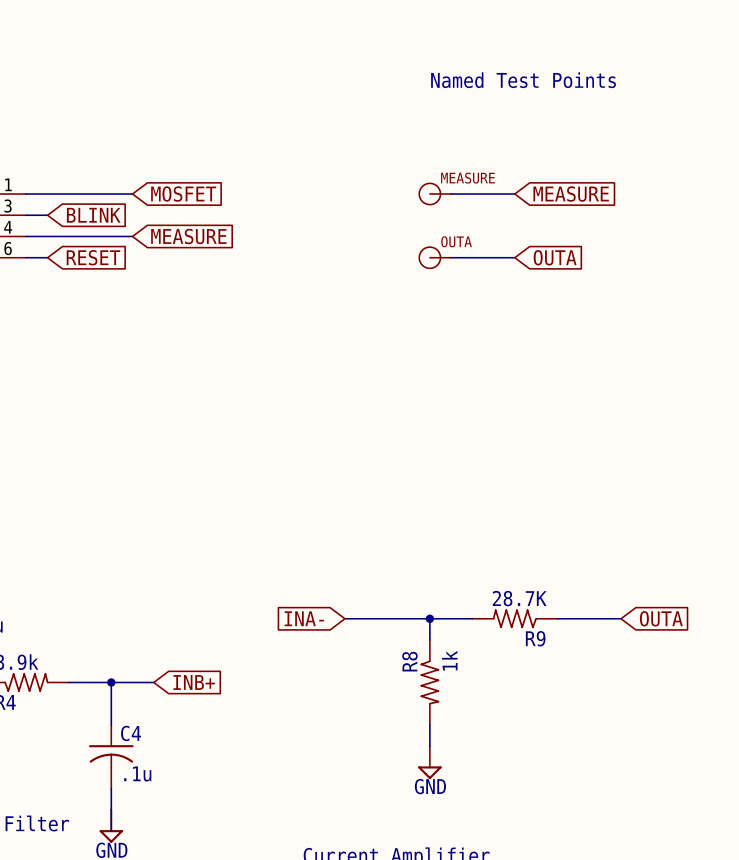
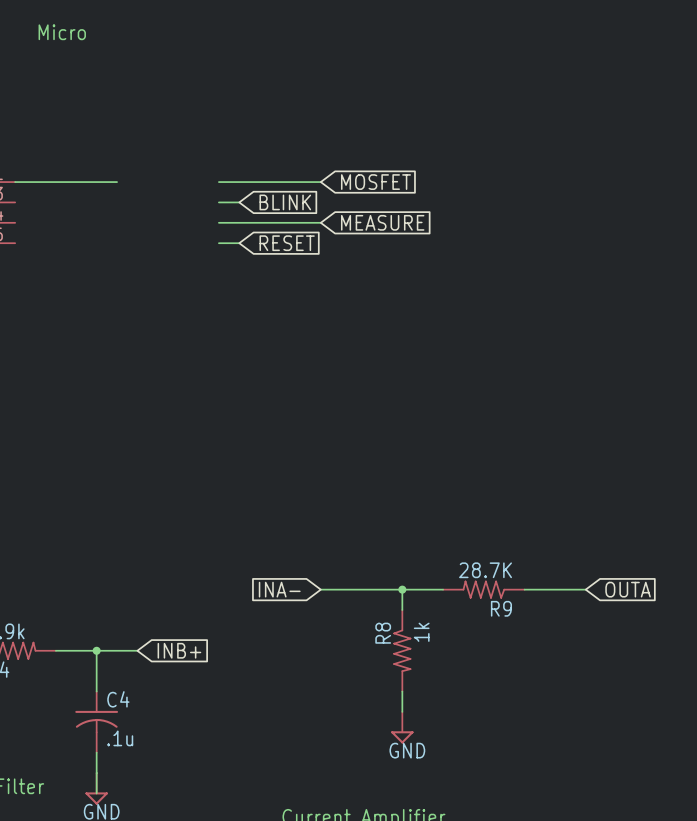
text: none -> Micro (62, 32)
text: Named Test Points (523, 80) -> none
global label: MOSFET (183, 194) -> none
wire: none -> (218, 182) (320, 182)
global label: none -> MOSFET (375, 182)
MEASURE: (434, 194) -> none
wire: (451, 194) (514, 194) -> none
global label: MEASURE (571, 194) -> none
wire: (26, 215) (47, 215) -> none
global label: BLINK (93, 215) -> none
wire: none -> (218, 202) (239, 202)
global label: none -> BLINK (285, 202)
wire: (26, 236) (132, 236) -> none
global label: MEASURE (188, 236) -> none
wire: none -> (218, 222) (320, 222)
global label: none -> MEASURE (382, 222)
wire: (26, 257) (47, 257) -> none
global label: RESET (93, 257) -> none
wire: none -> (218, 243) (239, 243)
global label: none -> RESET (287, 243)
OUTA: (434, 257) -> none
wire: (451, 257) (514, 257) -> none
global label: OUTA (555, 257) -> none

